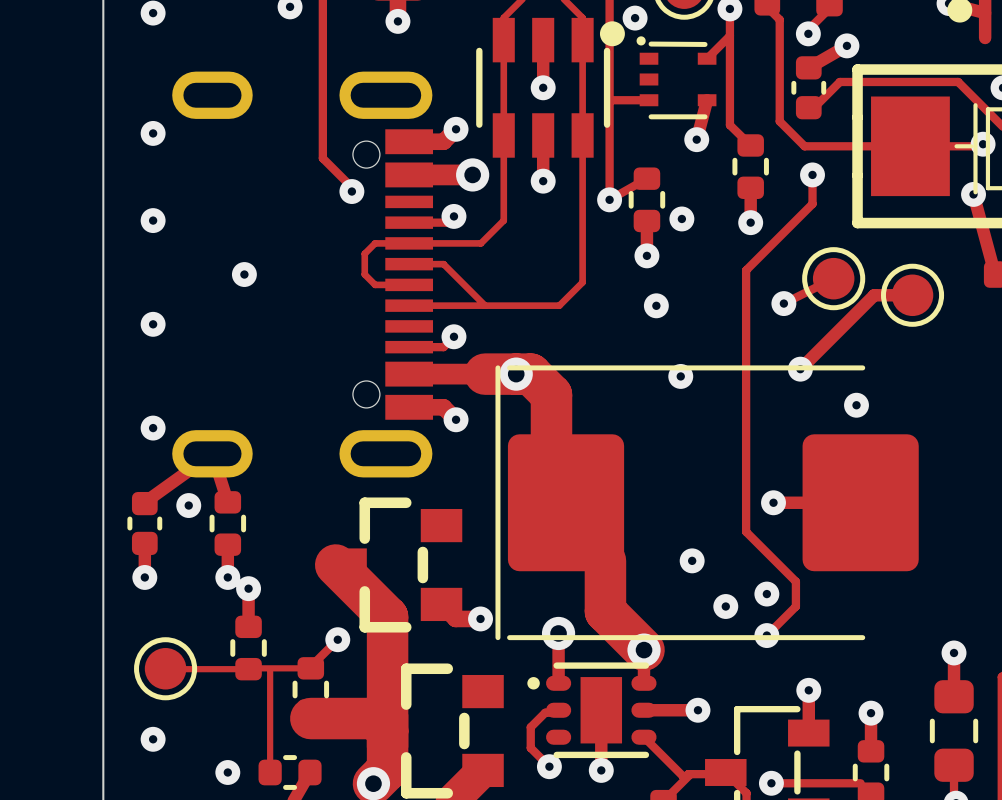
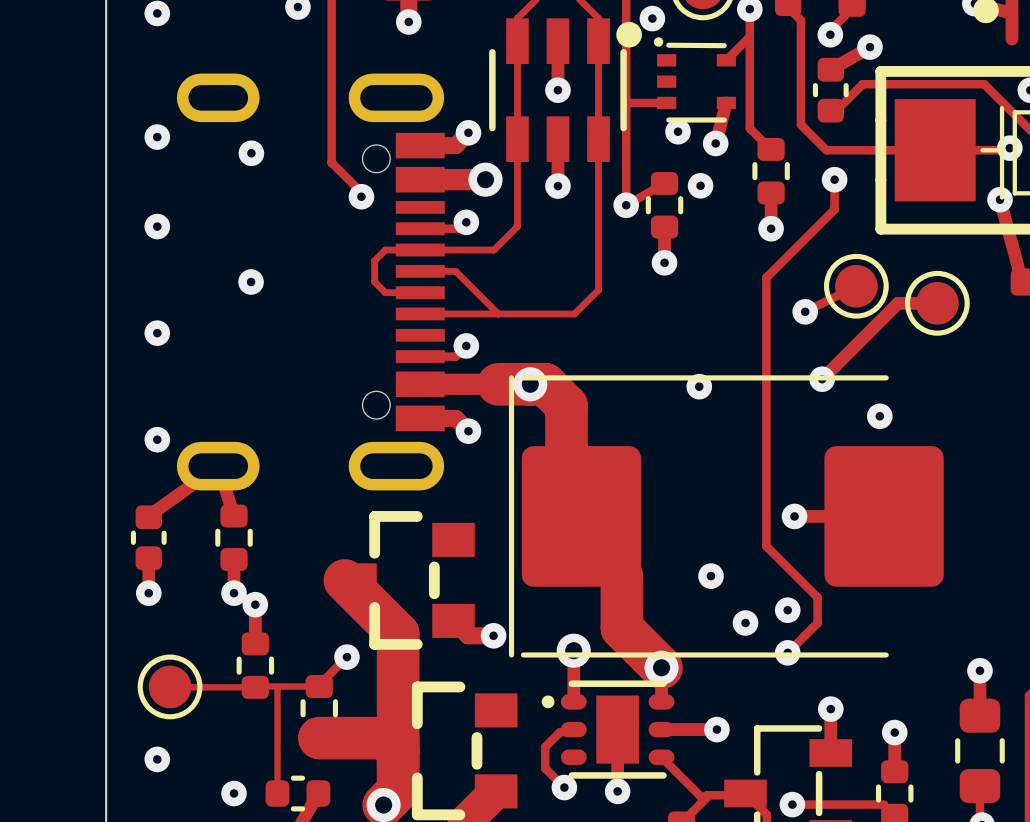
via: none -> (678, 131)
via: none -> (251, 153)
via position: (681, 218) -> (700, 185)
via: (656, 305) -> none
via: (188, 505) -> none

